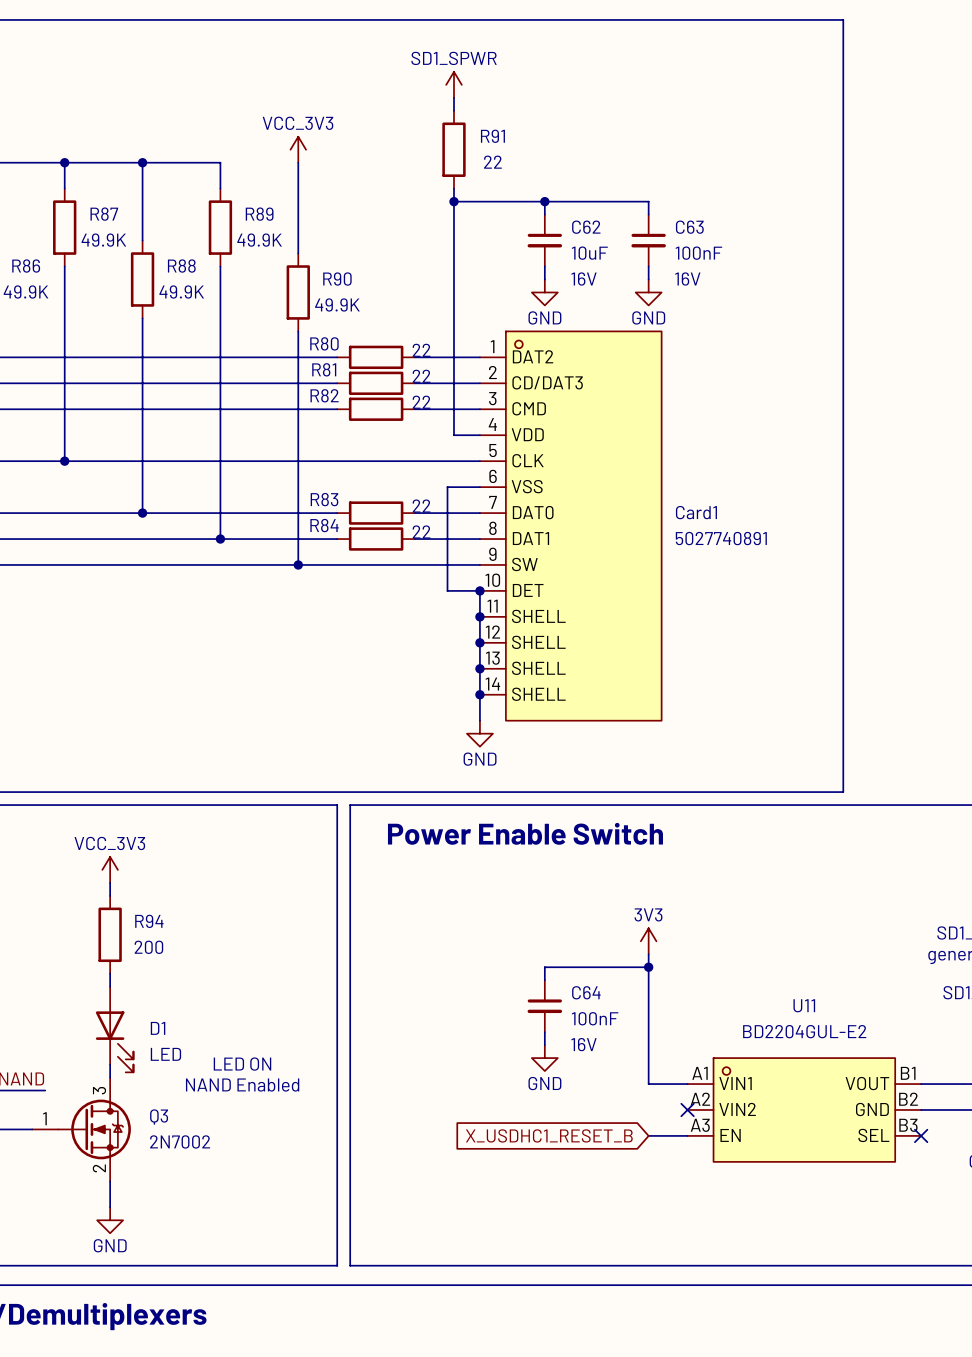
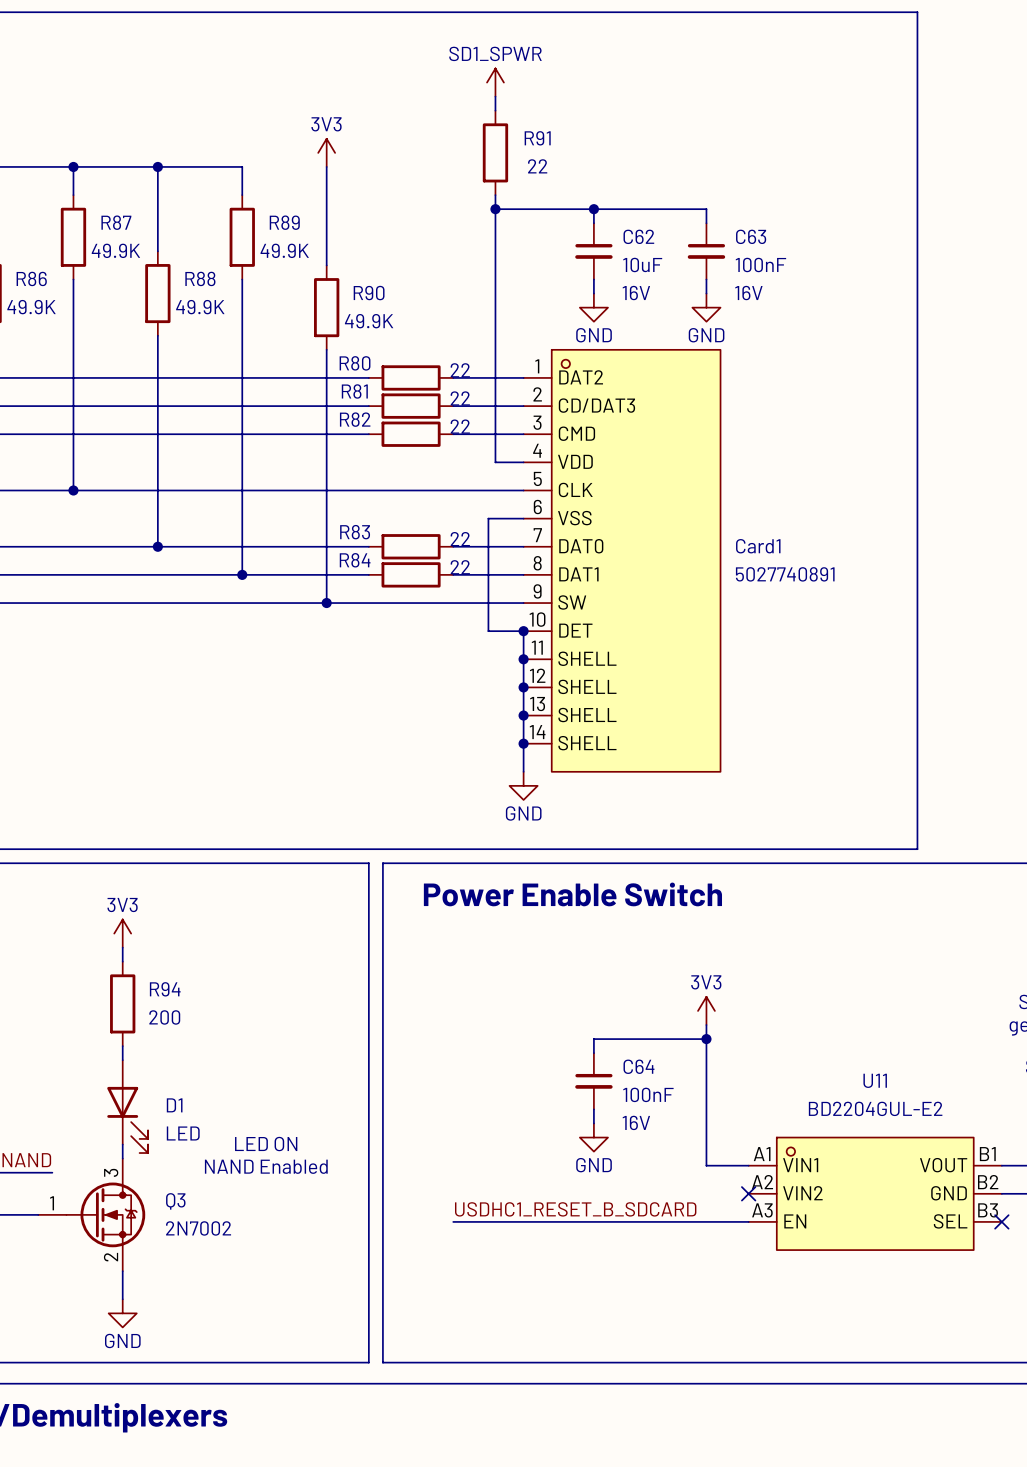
power symbol: VCC_3V3 (298, 149) -> 3V3 (326, 152)
power symbol: VCC_3V3 (110, 869) -> 3V3 (122, 933)
label: none -> USDHC1_RESET_B_SDCARD (575, 1209)
wire: none -> (453, 1221) (706, 1221)
global label: X_USDHC1_RESET_B (549, 1135) -> none

